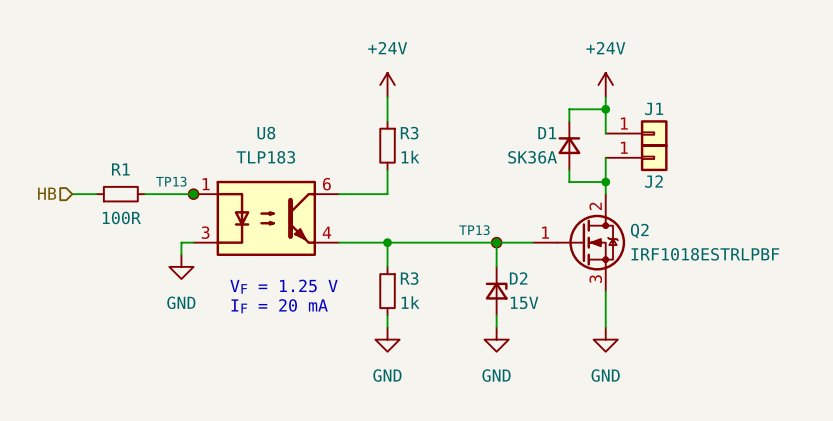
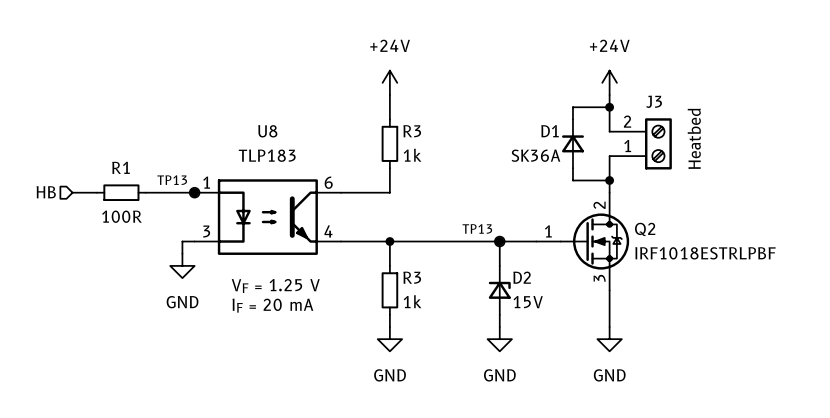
J1: (636, 133) -> none
J3: none -> Heatbed (640, 143)
J2: (636, 157) -> none

